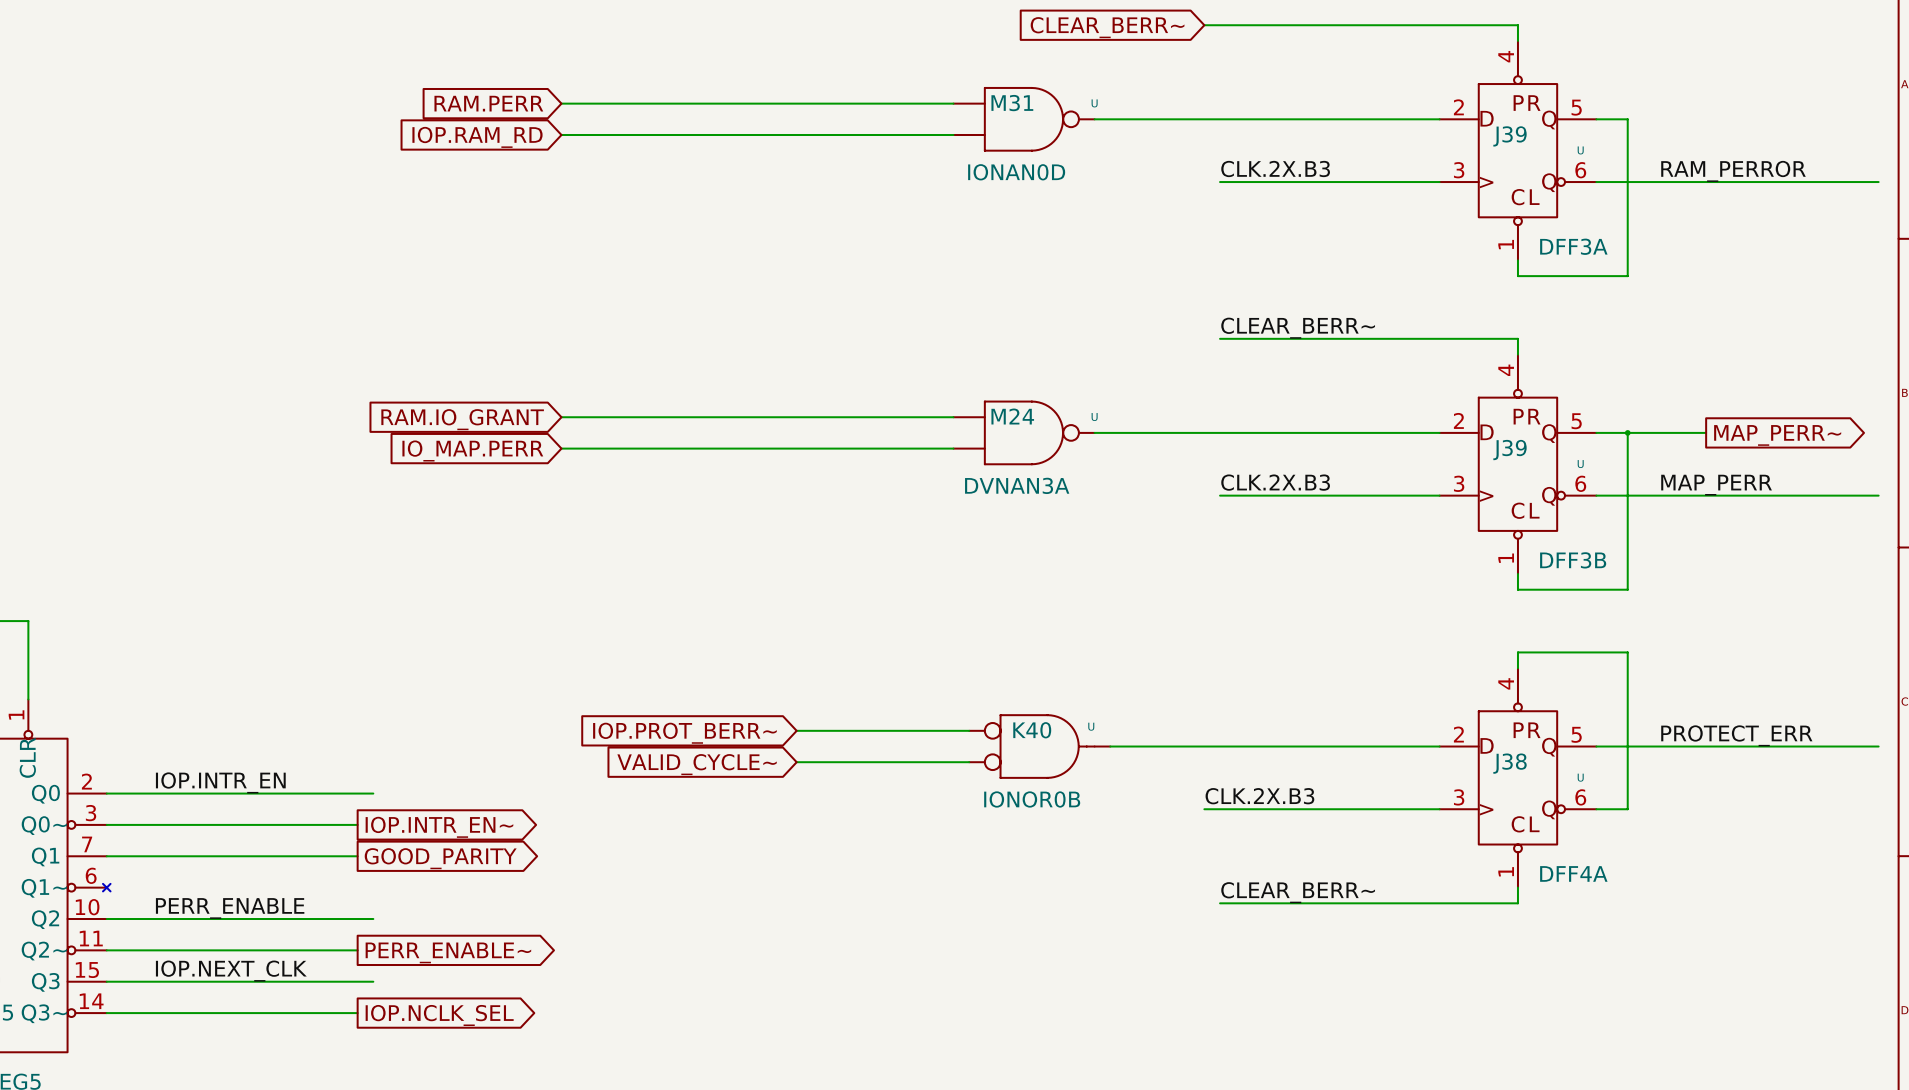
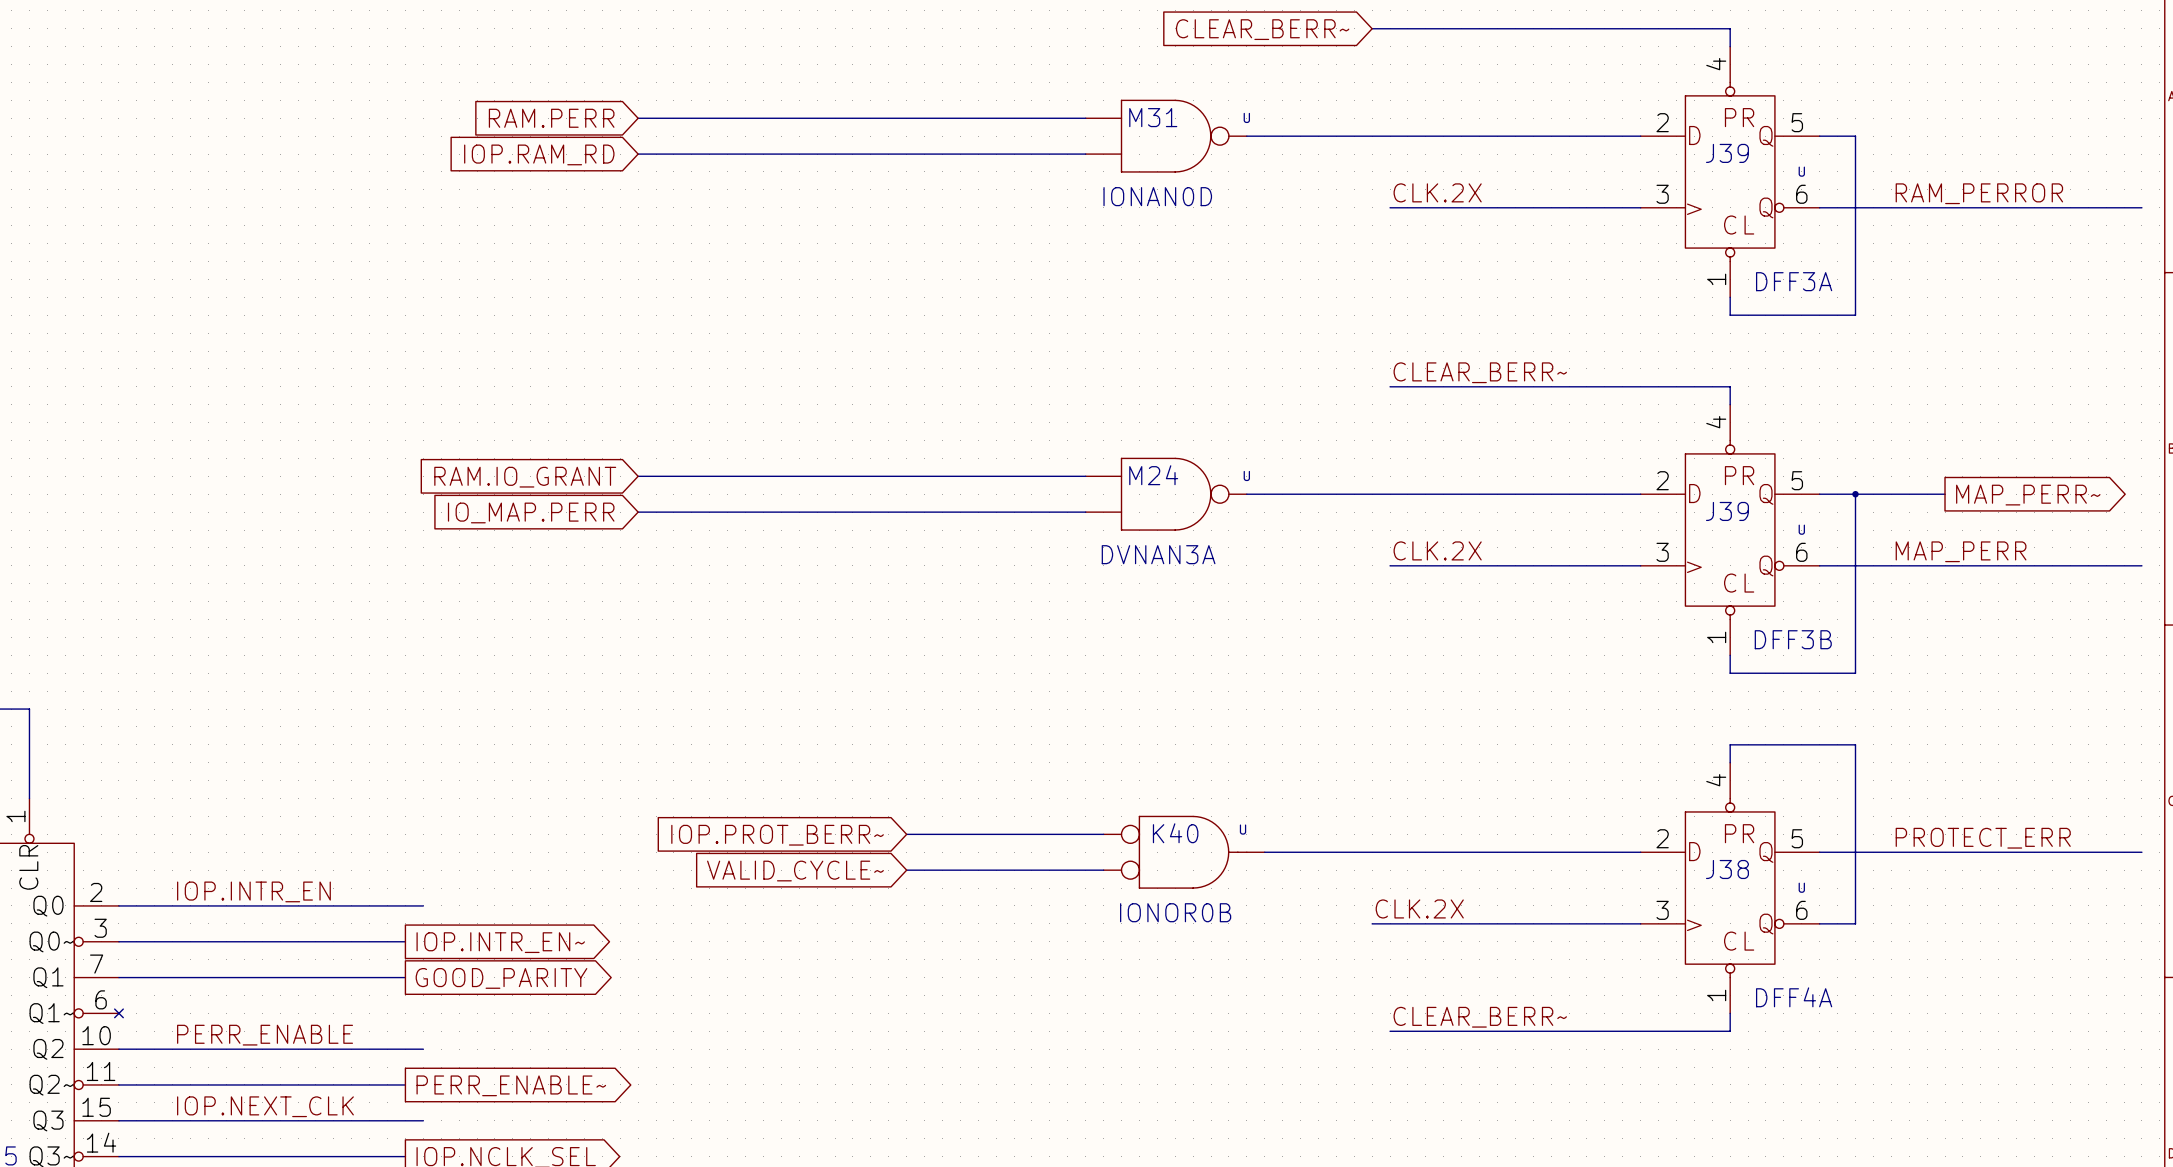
label: CLK.2X.B3 (1275, 168) -> CLK.2X (1437, 192)
label: CLK.2X.B3 (1275, 482) -> CLK.2X (1437, 550)
label: CLK.2X.B3 (1259, 796) -> CLK.2X (1419, 908)

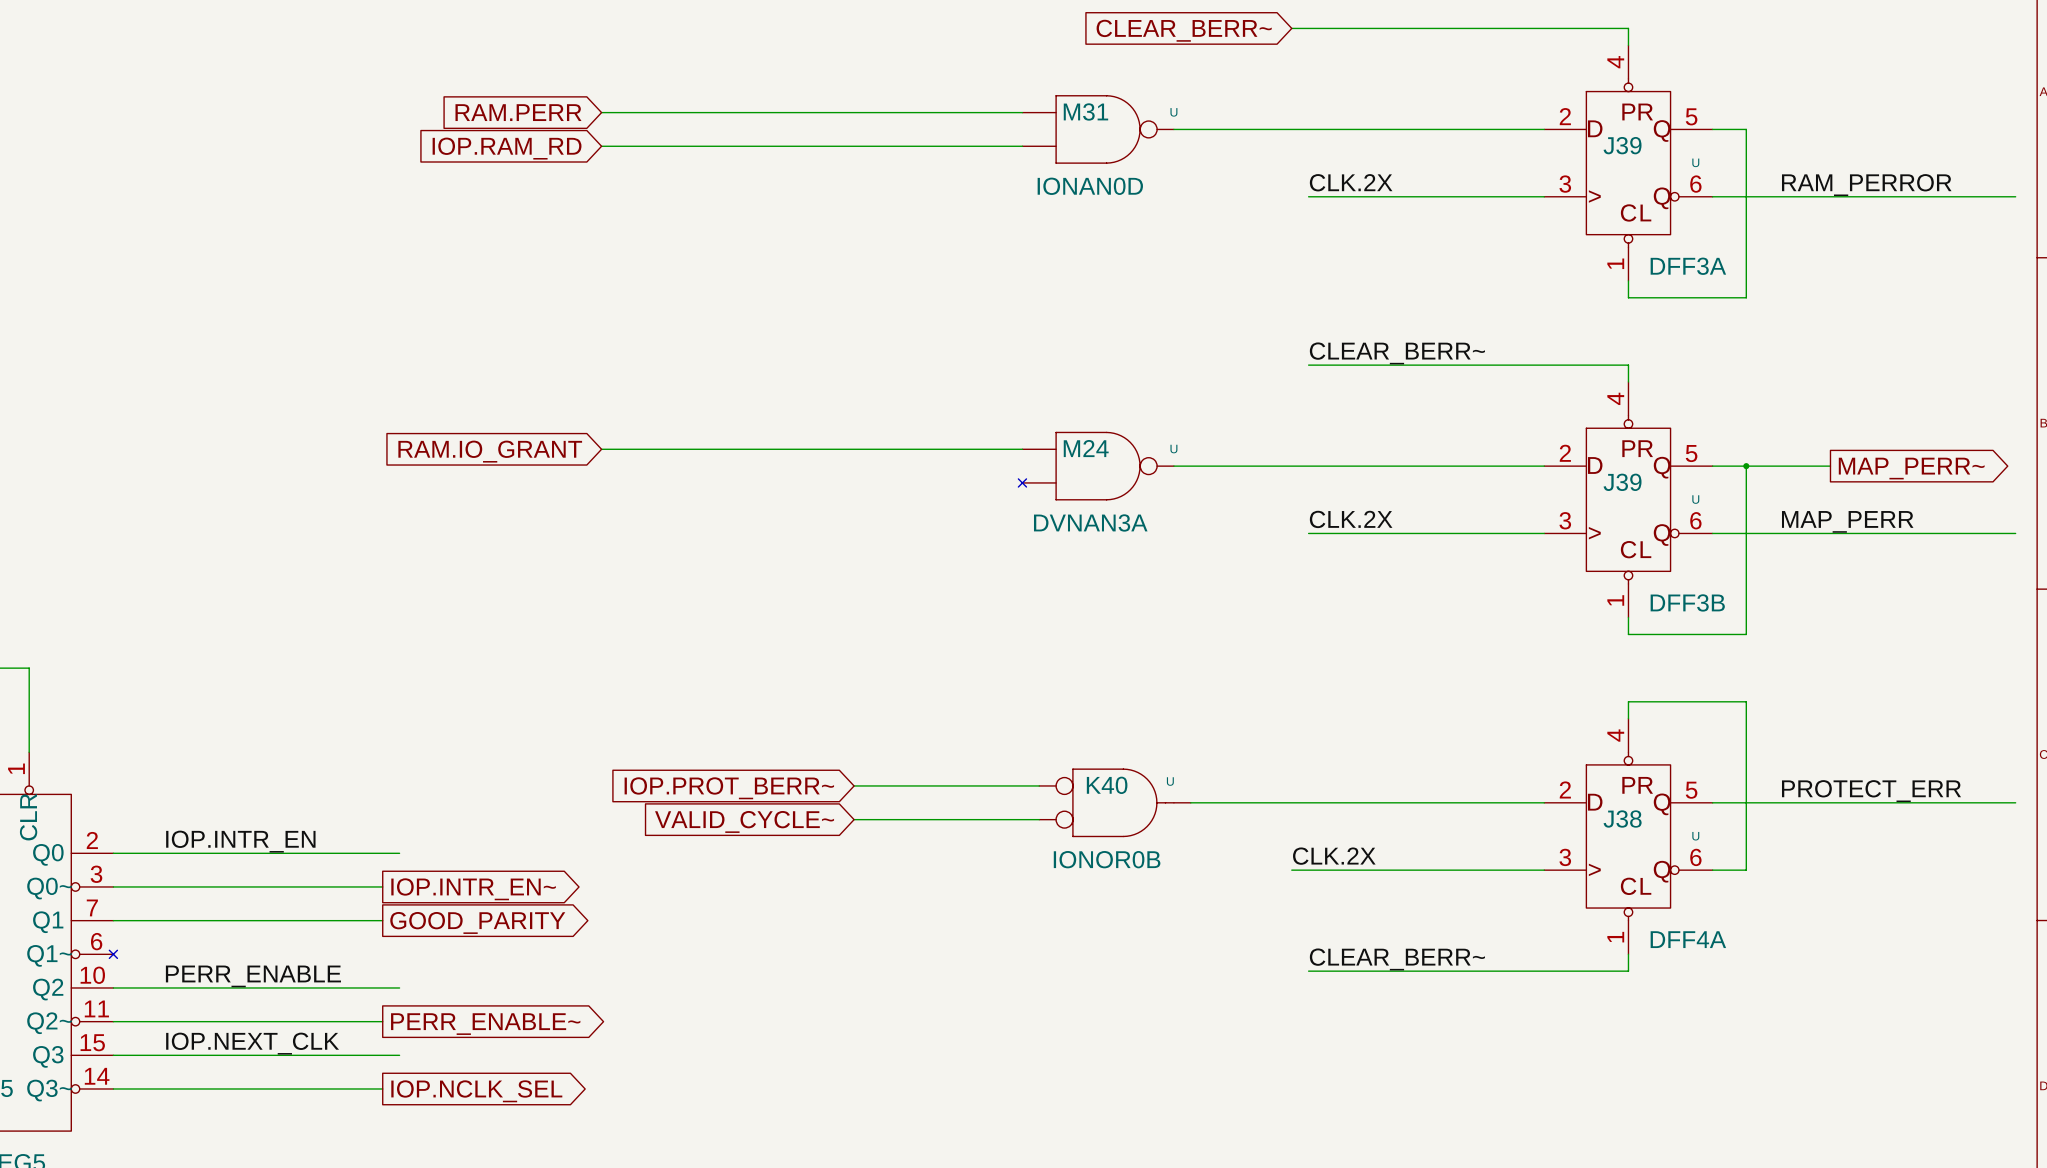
global label: IO_MAP.PERR (531, 512) -> none
wire: (638, 512) (1085, 512) -> none
no-connect mark: none -> (1022, 482)

